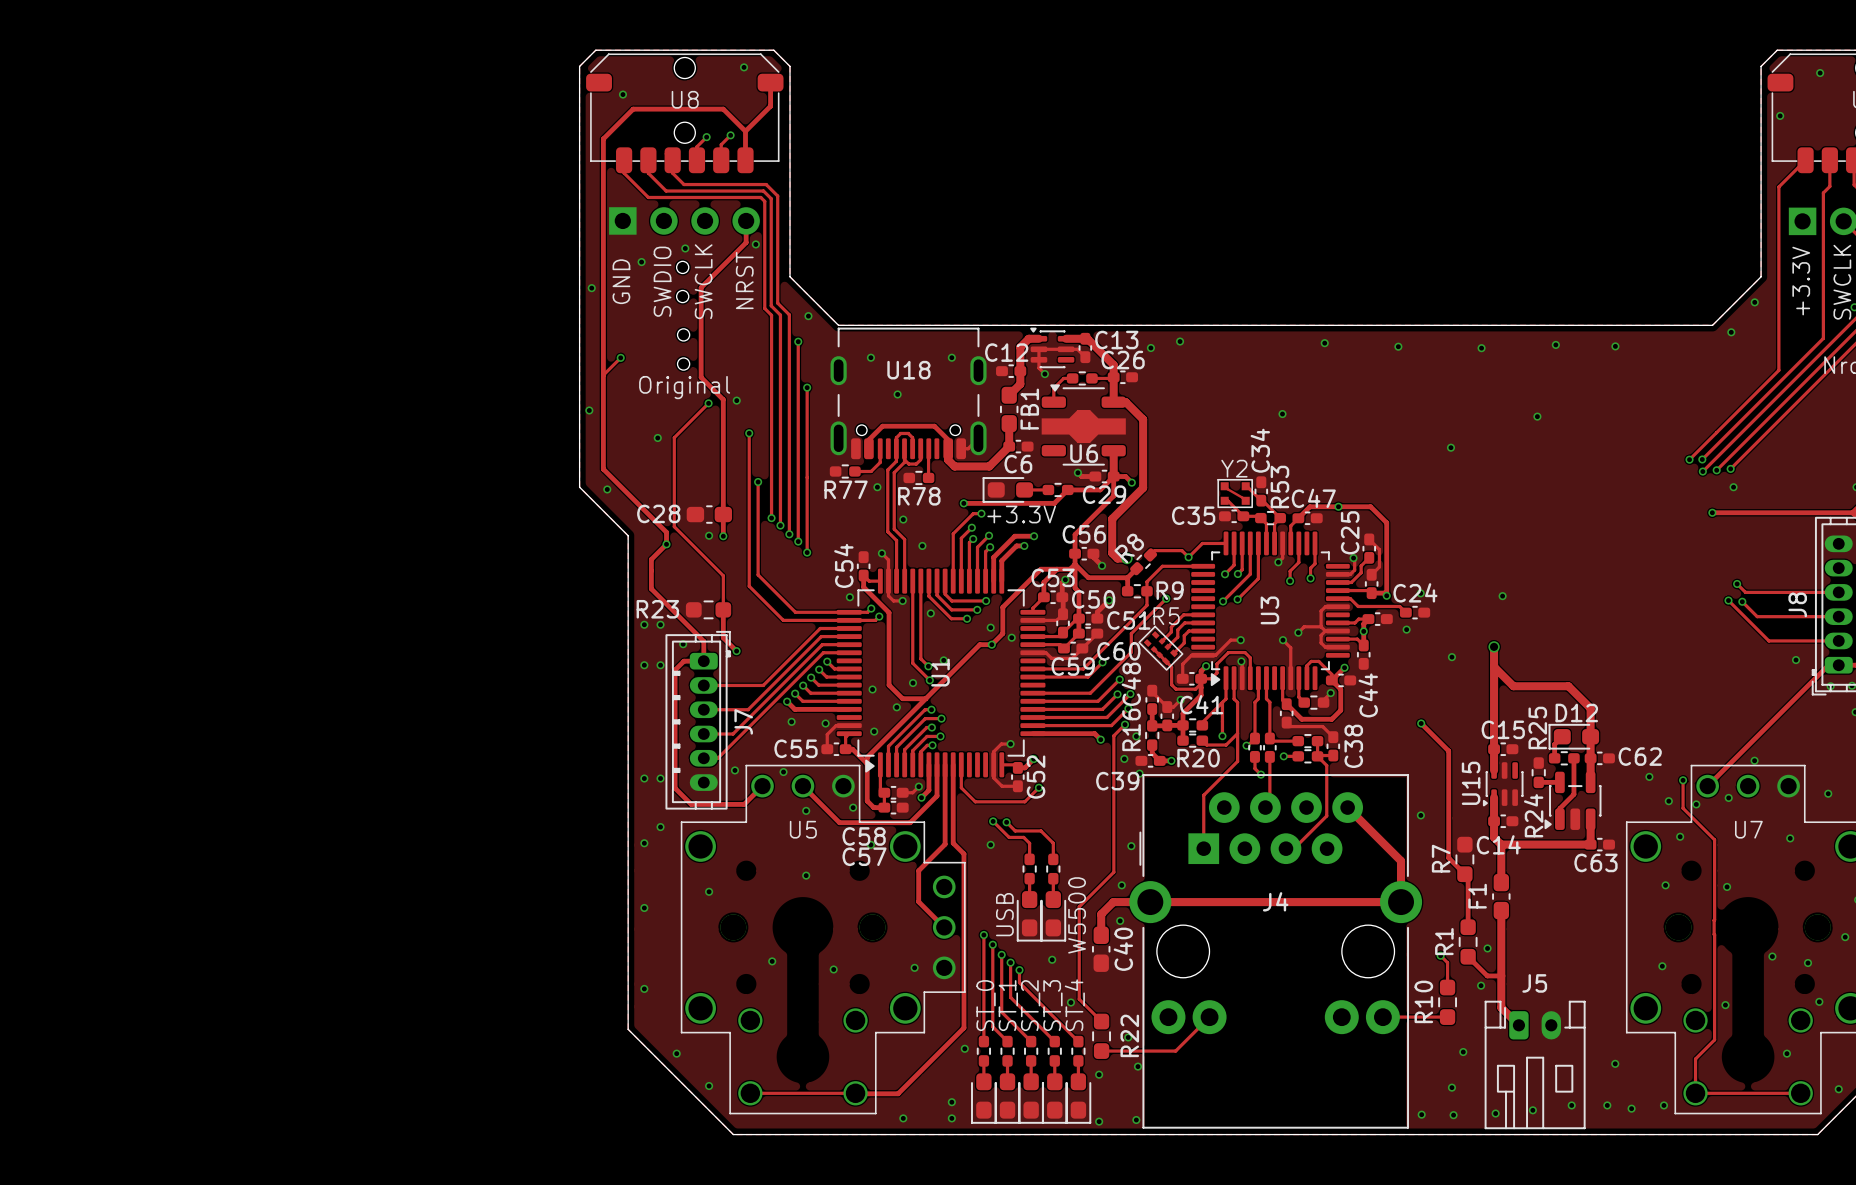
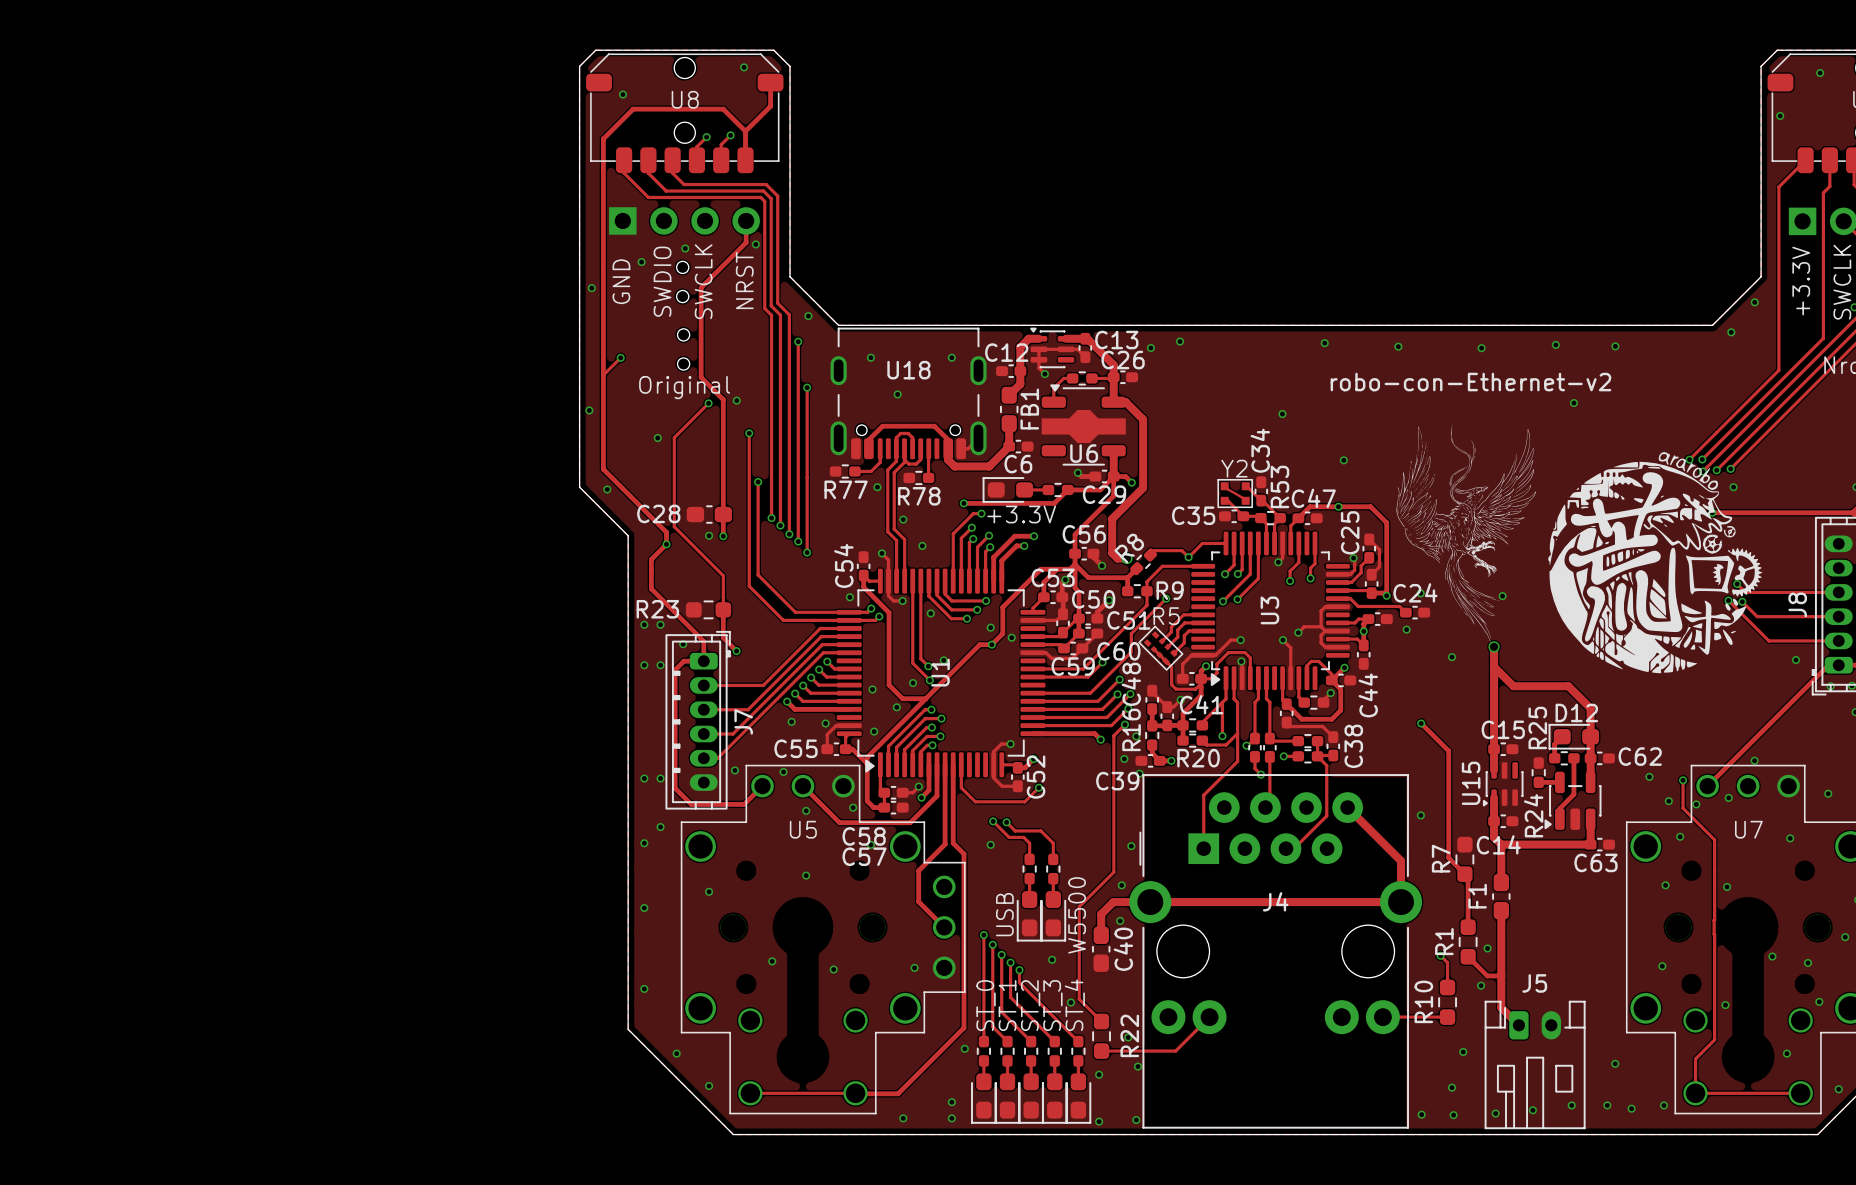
text: none -> robo-con-Ethernet-v2 (1470, 382)
via position: (1537, 416) -> (1573, 403)
drawing: none -> [1396, 423, 1763, 674]
via: (1450, 447) -> none
via: none -> (1343, 460)

